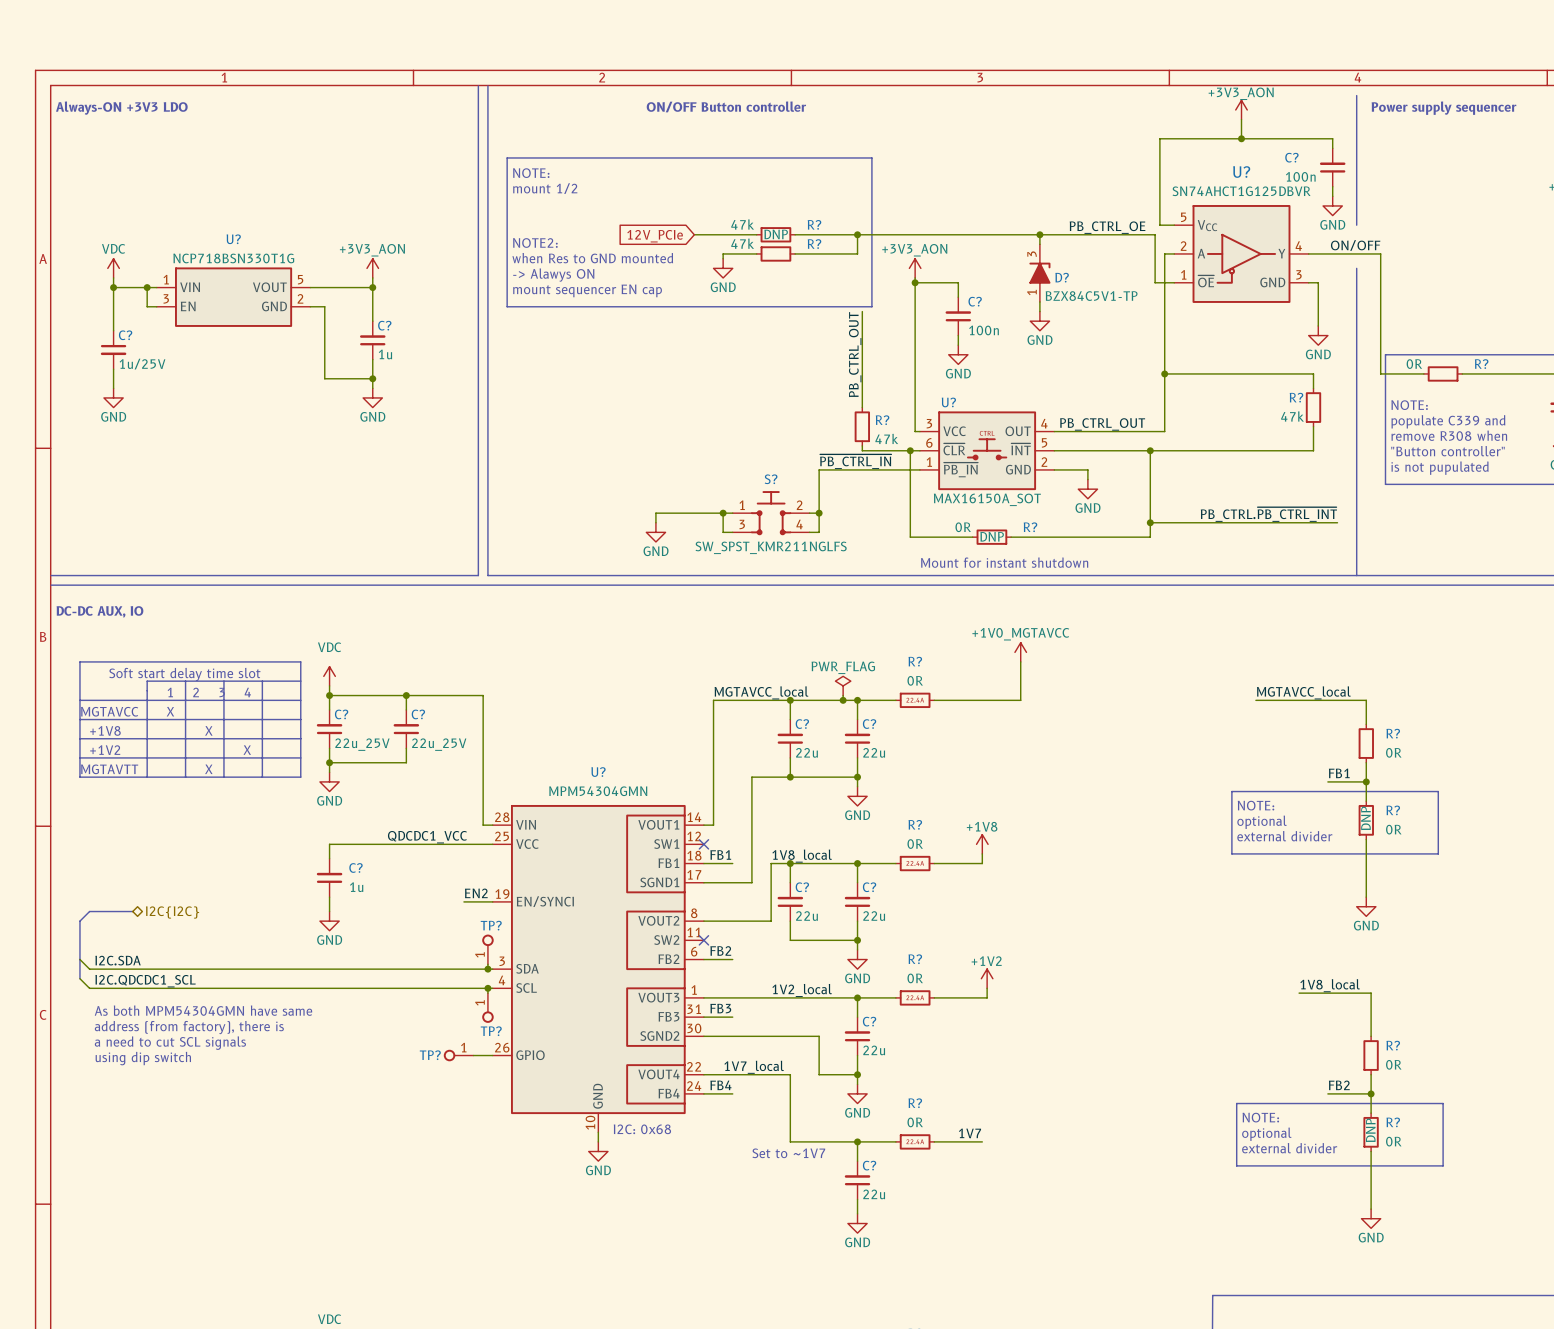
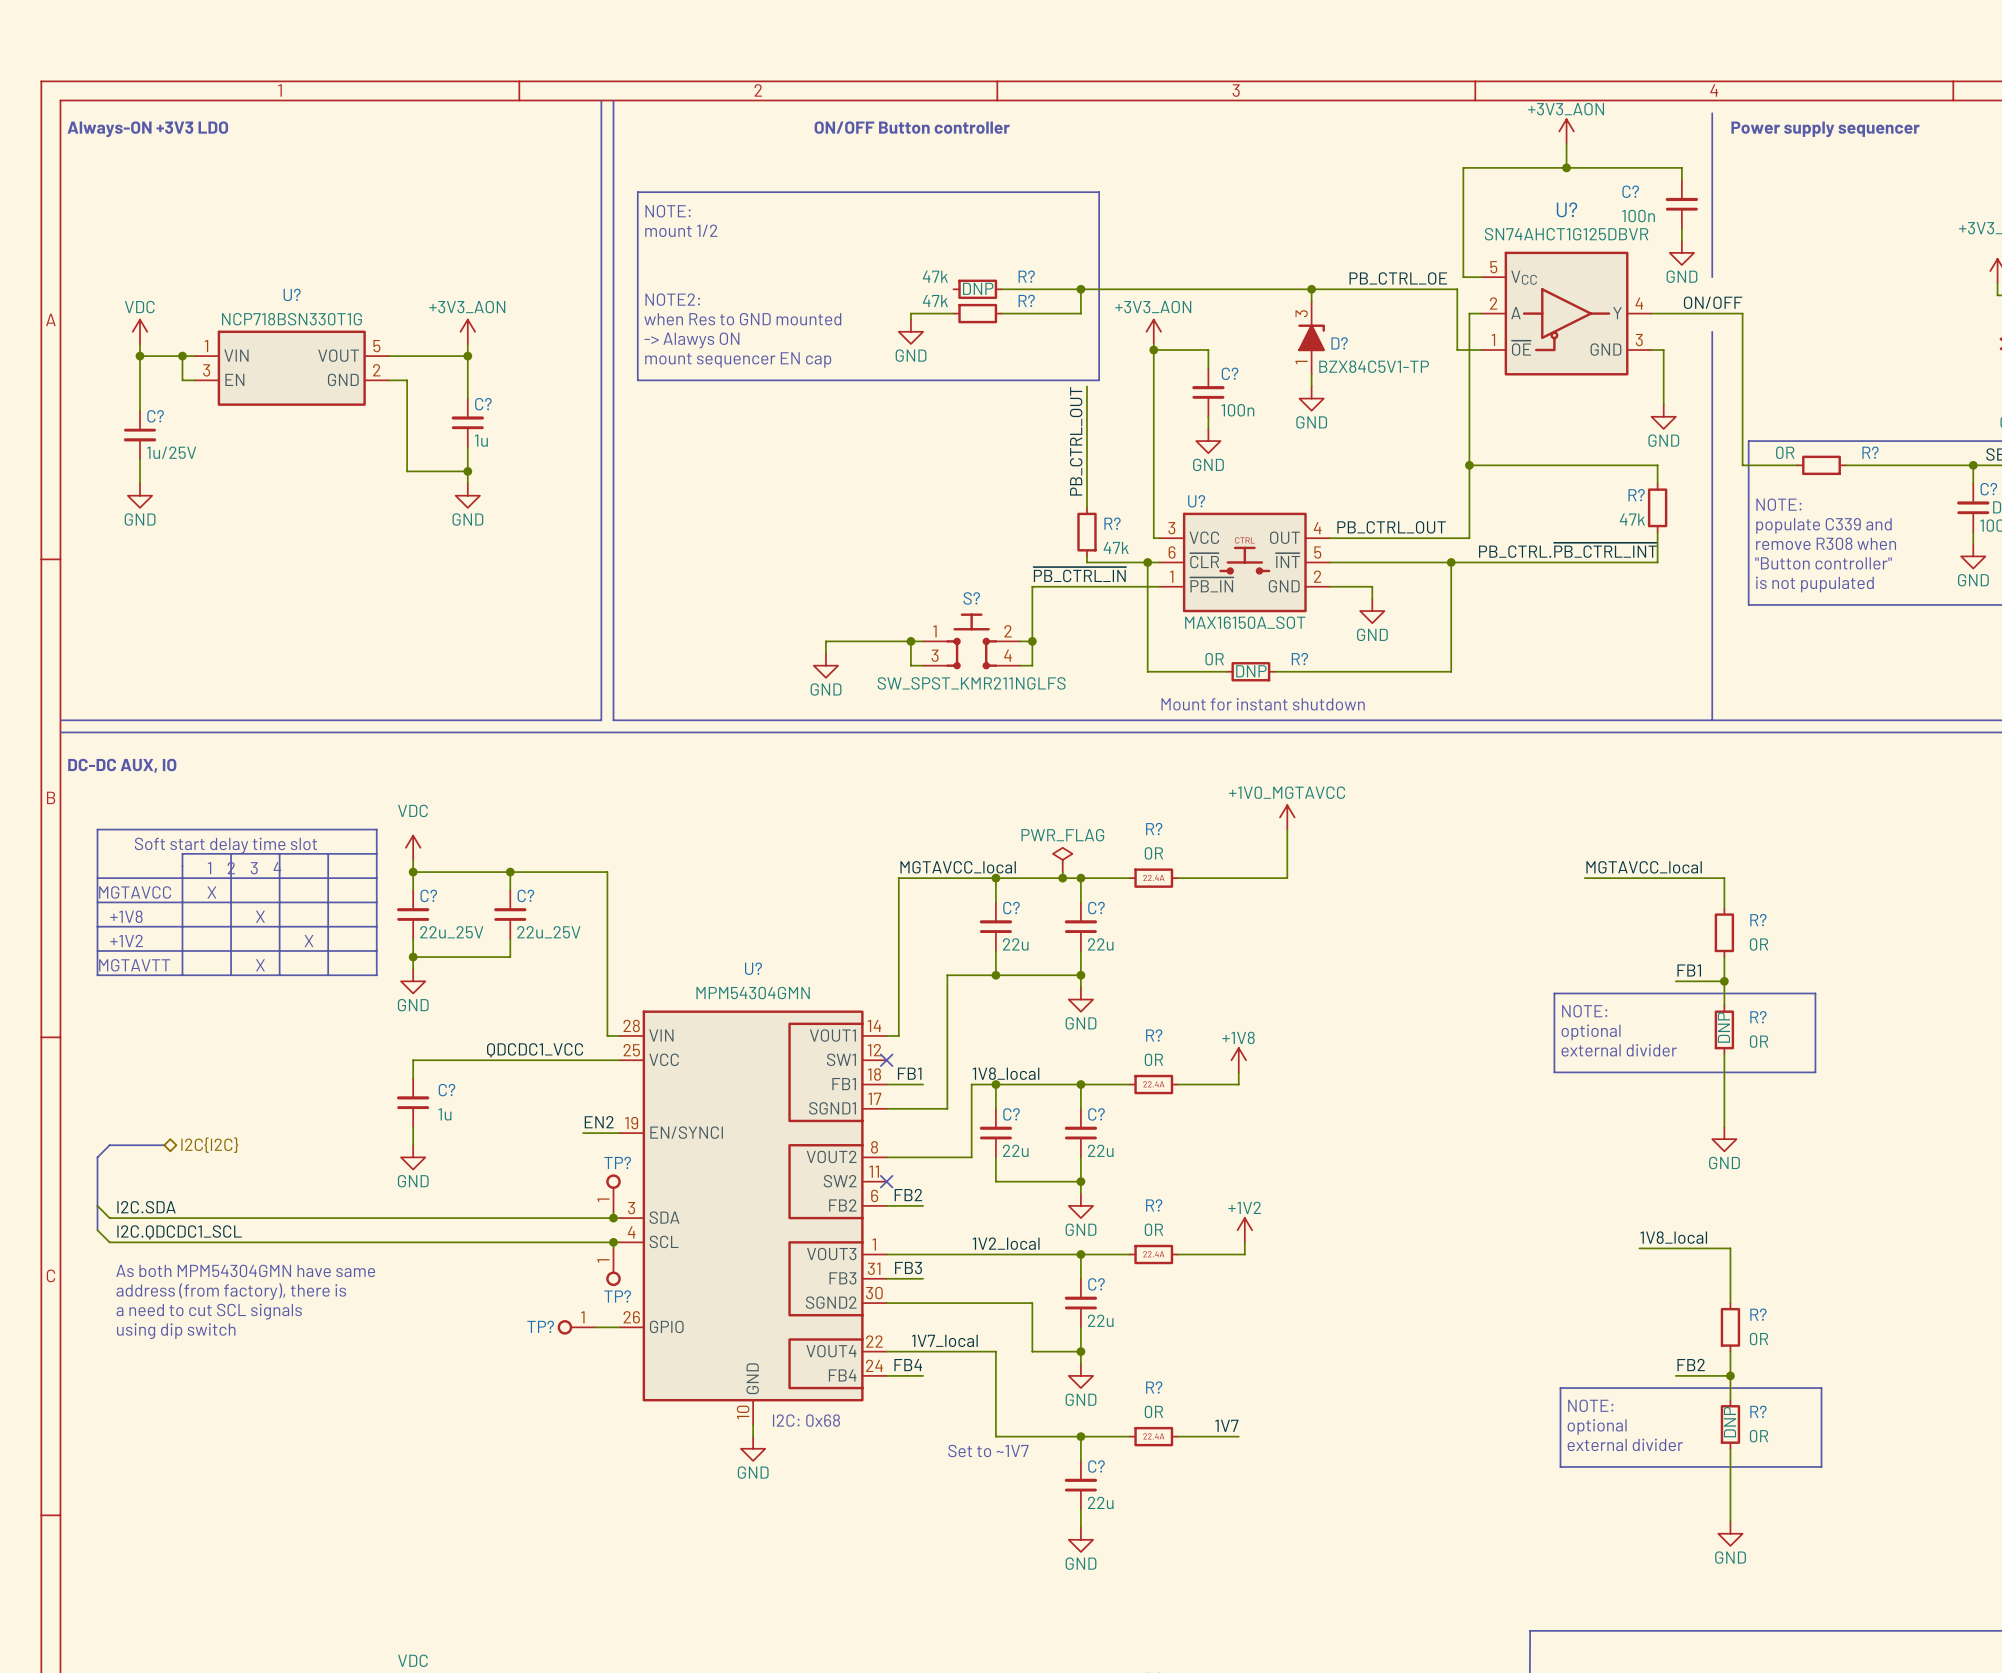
wire: (694, 234) (756, 234) -> none
global label: 12V_PCIe (655, 236) -> none
label position: PB_CTRL.~{PB_CTRL_INT} (1268, 514) -> PB_CTRL.~{PB_CTRL_INT} (1567, 550)
wire: (1150, 522) (1337, 522) -> none
junction: (1150, 522) -> none

